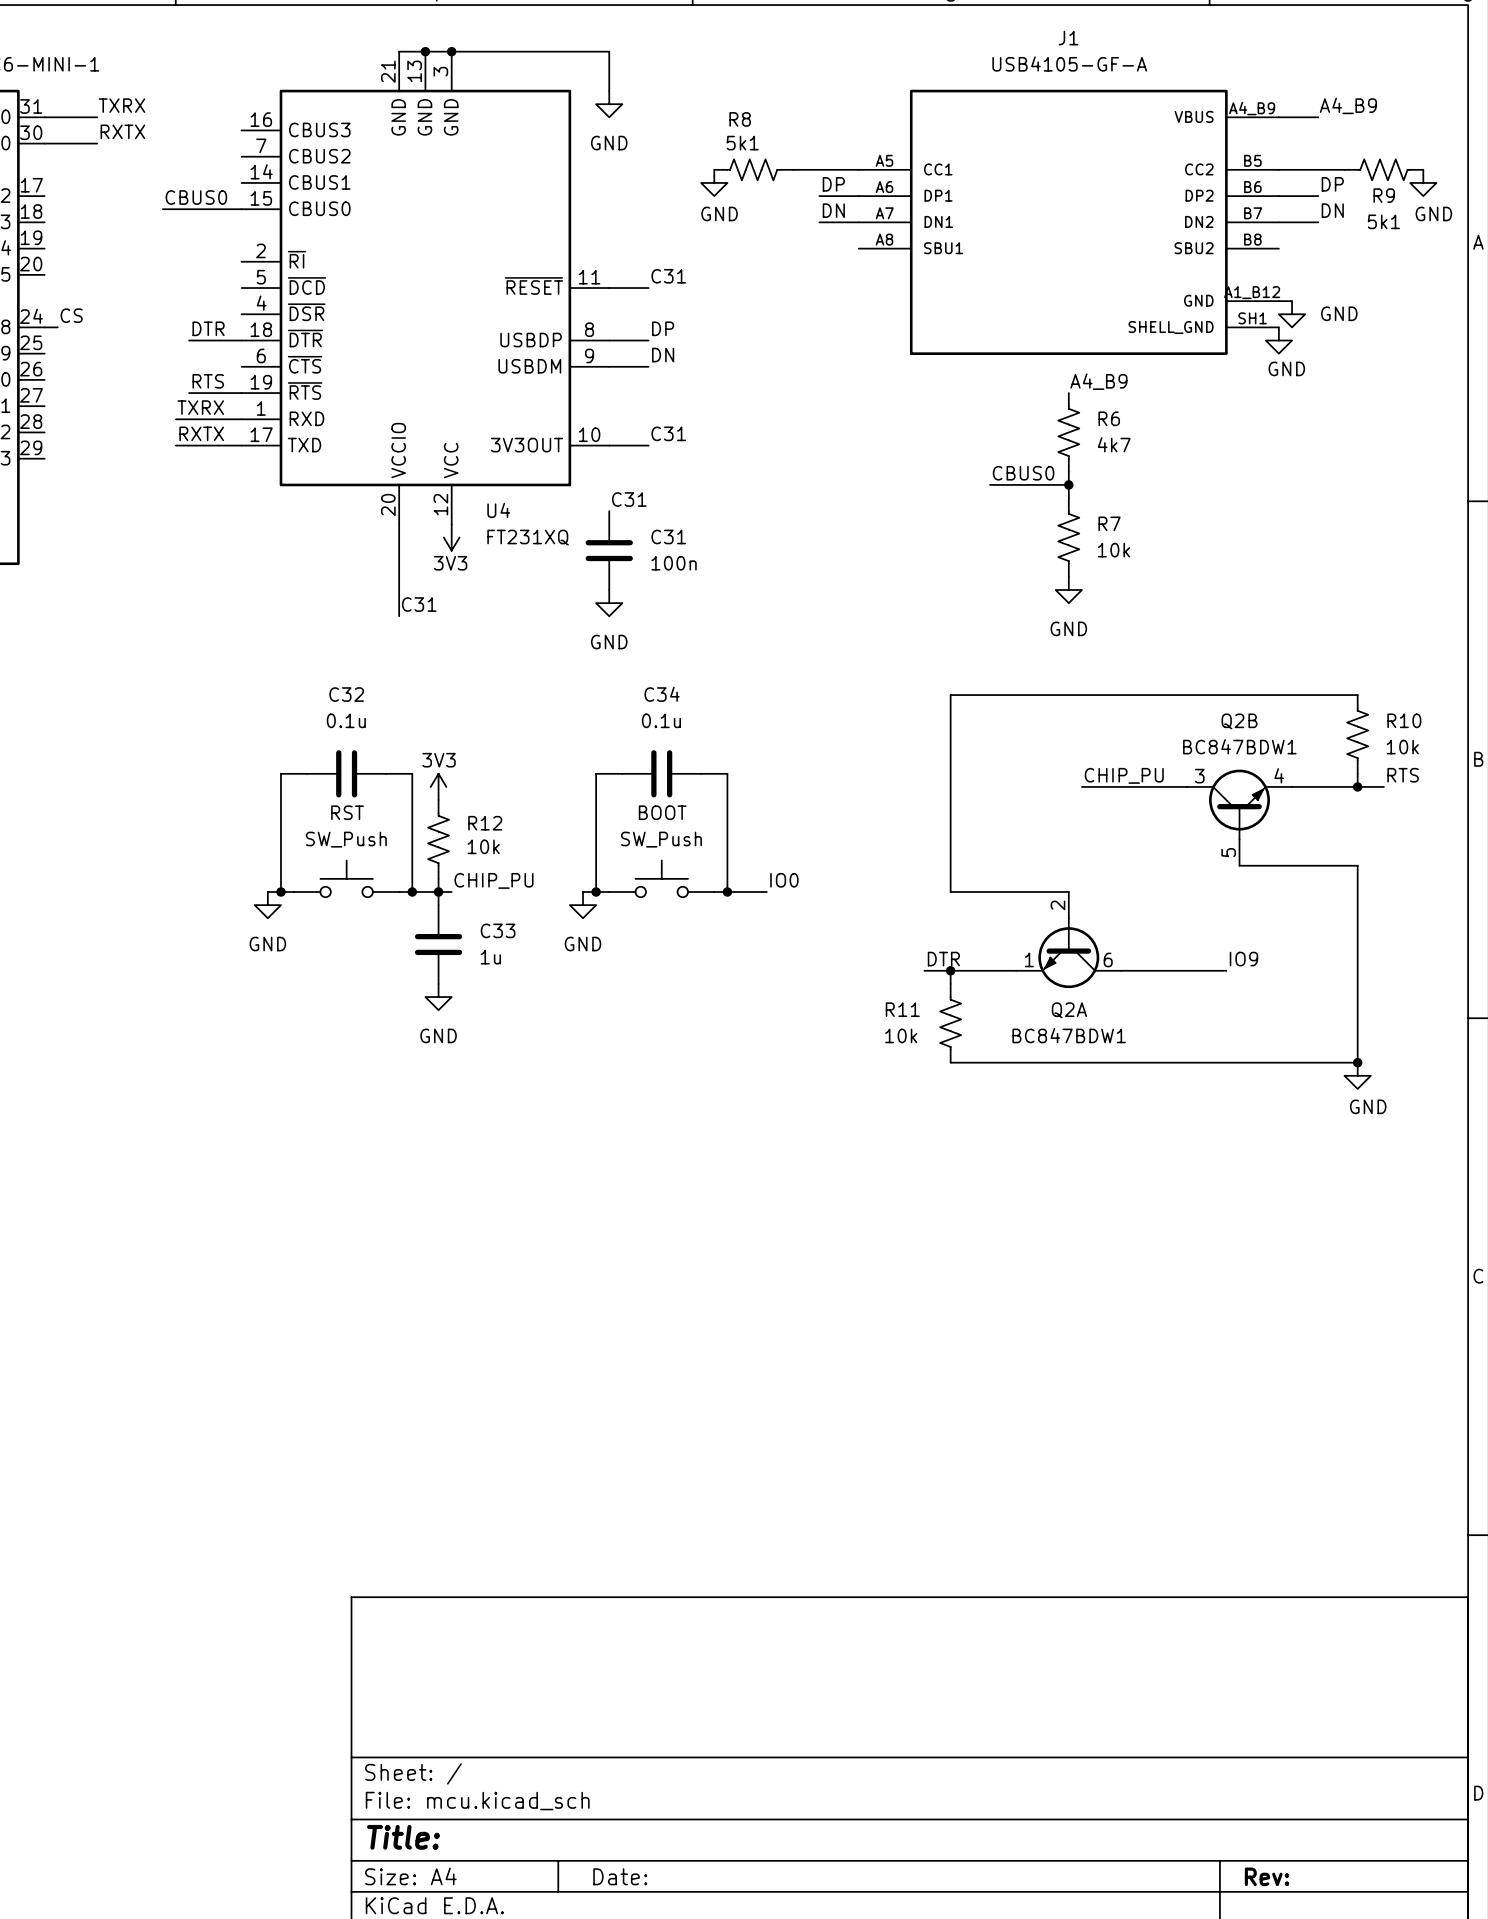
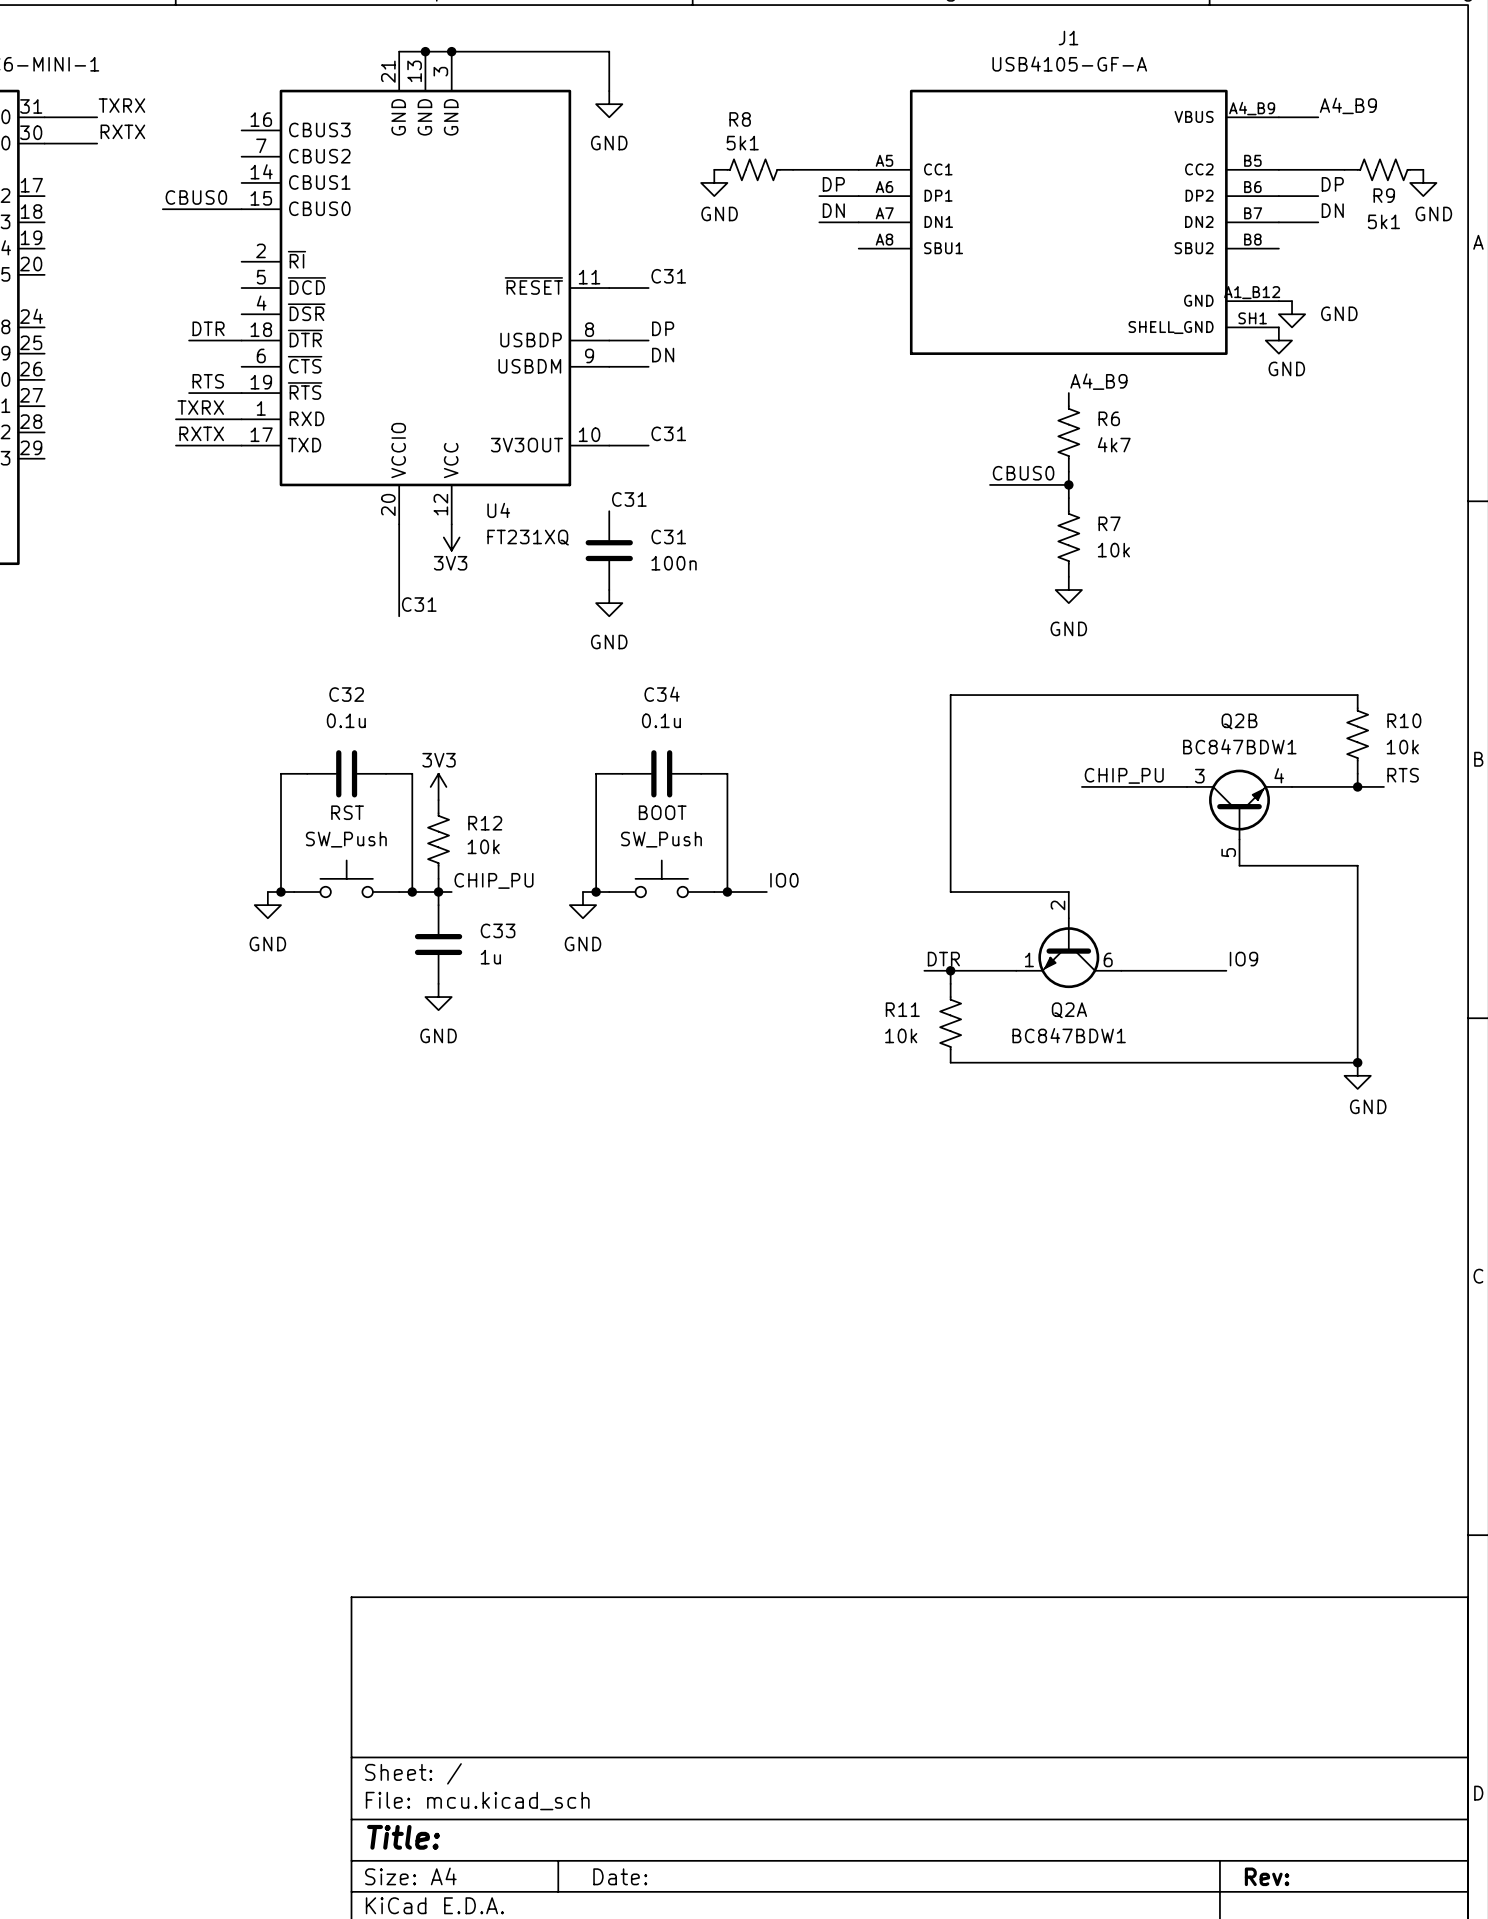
label: CS (71, 315) -> none
wire: (44, 327) (57, 327) -> none

